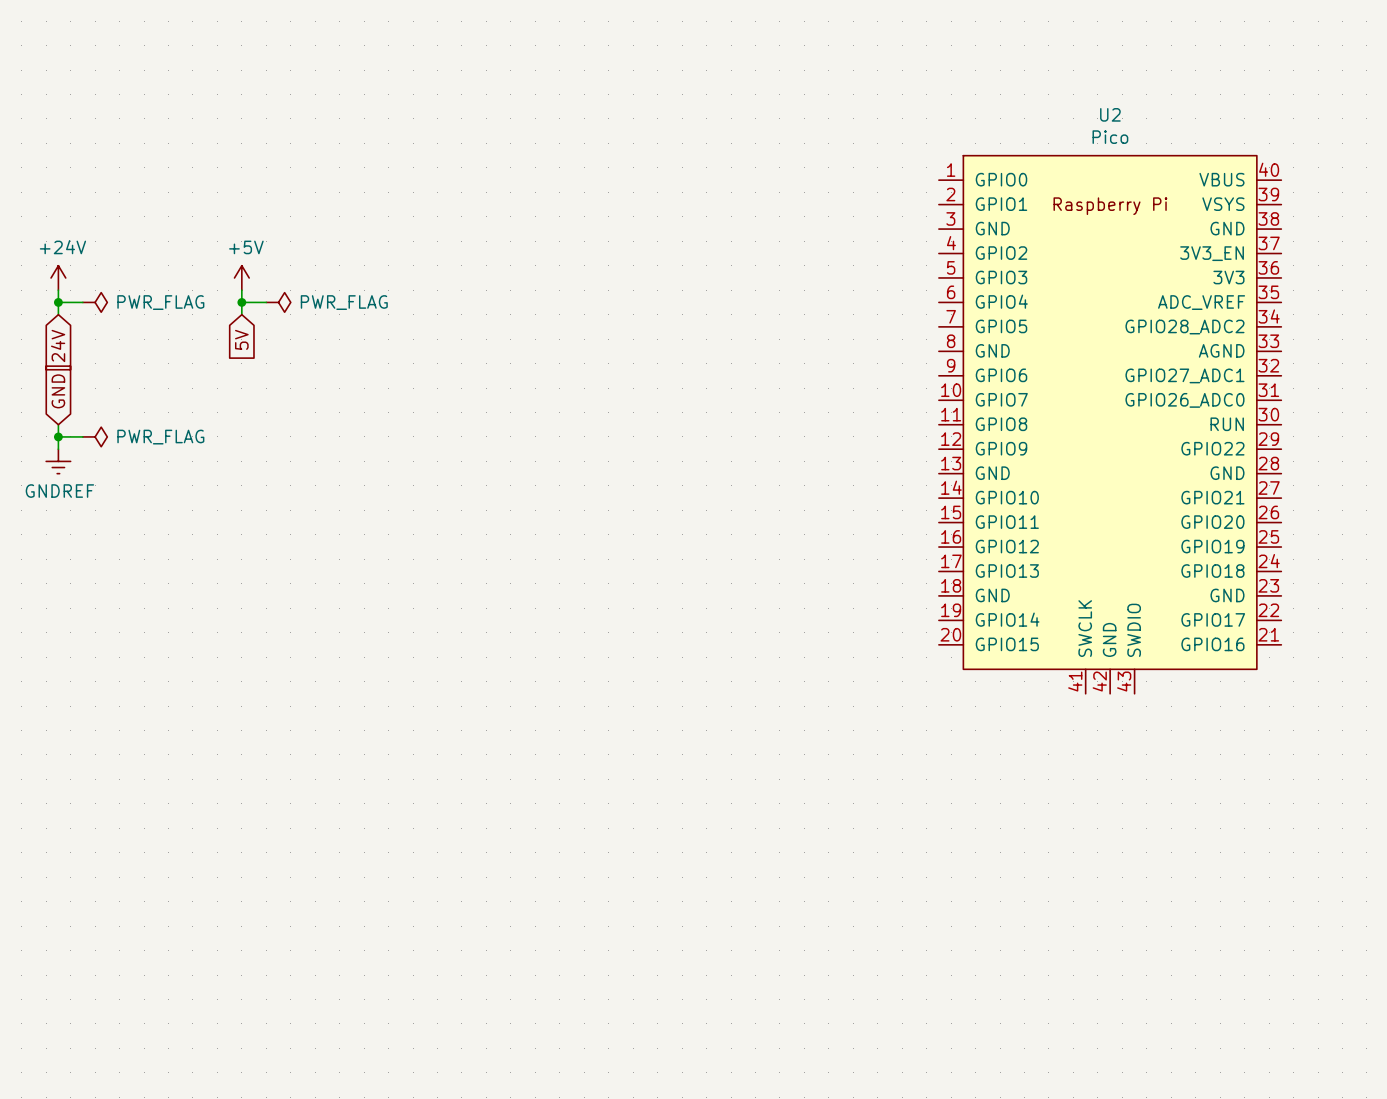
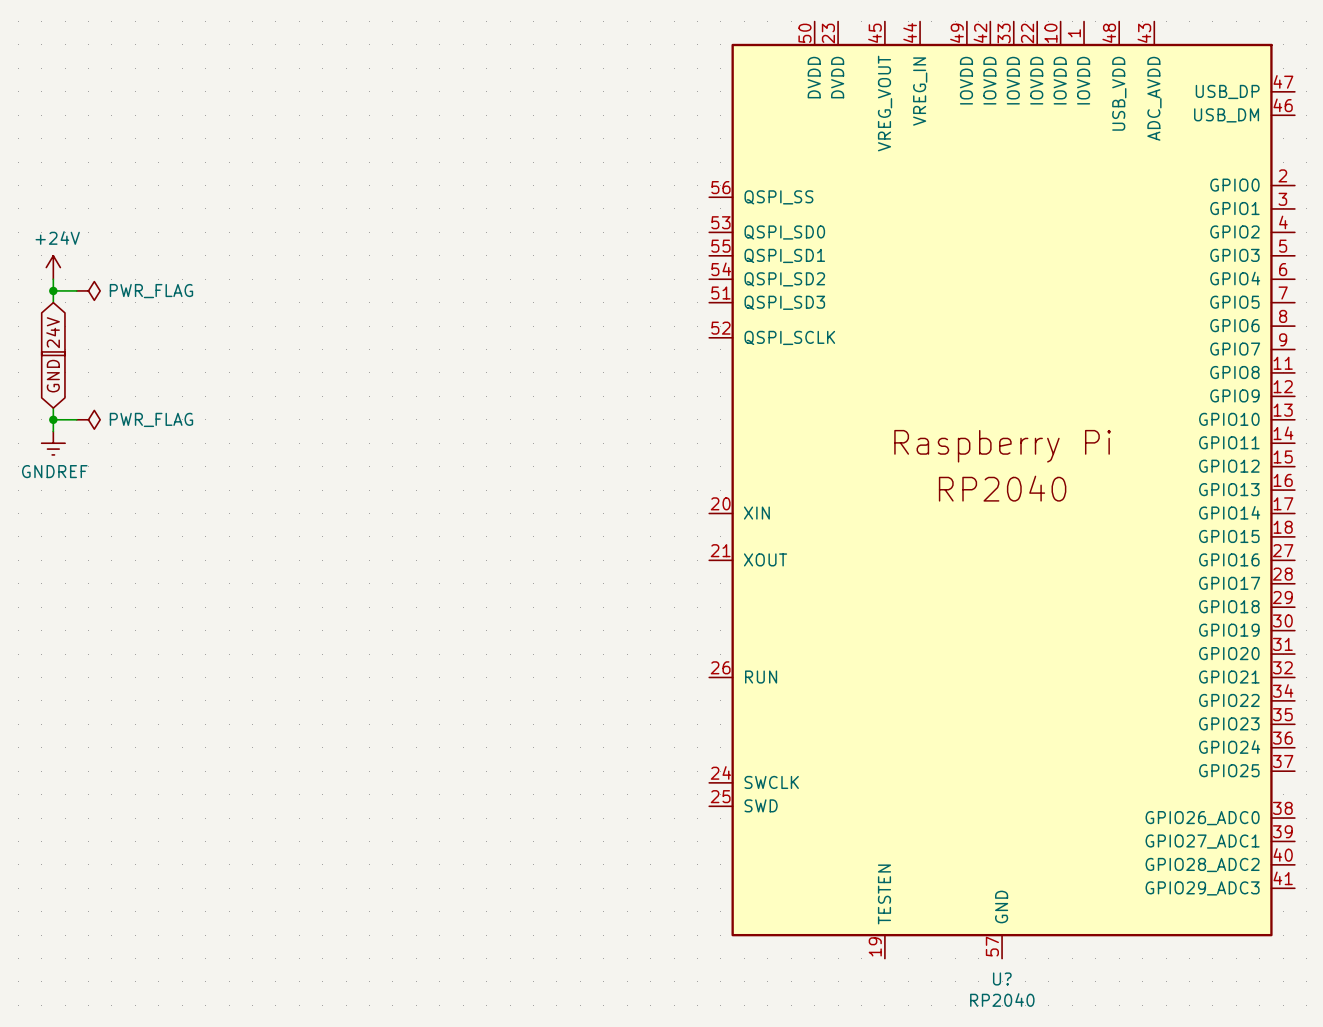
power symbol: +5V (241, 277) -> none
wire: (241, 290) (241, 314) -> none
wire: (241, 302) (266, 302) -> none
junction: (241, 302) -> none
power symbol: PWR_FLAG (278, 302) -> none
global label: 5V (241, 339) -> none
U2: Pico (1110, 424) -> none
U?: none -> RP2040 (1002, 490)

